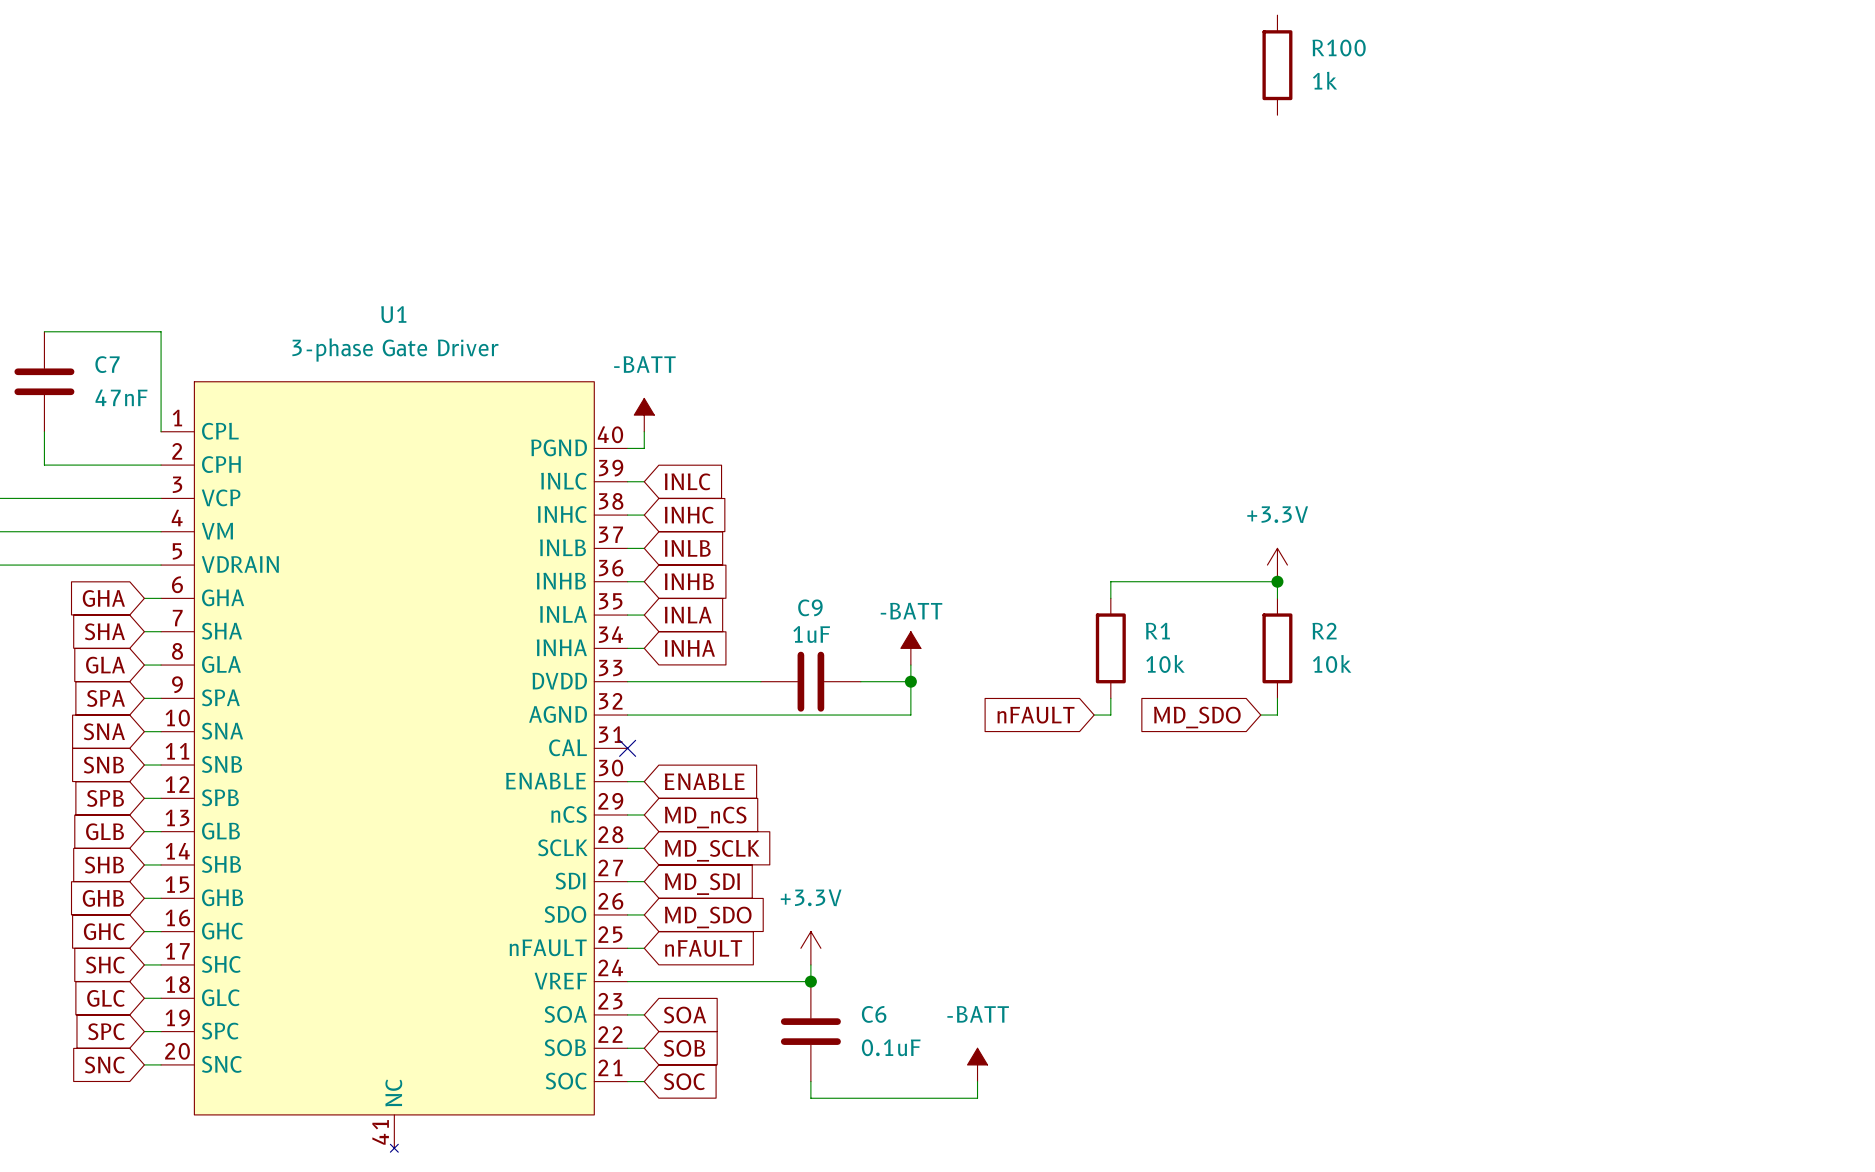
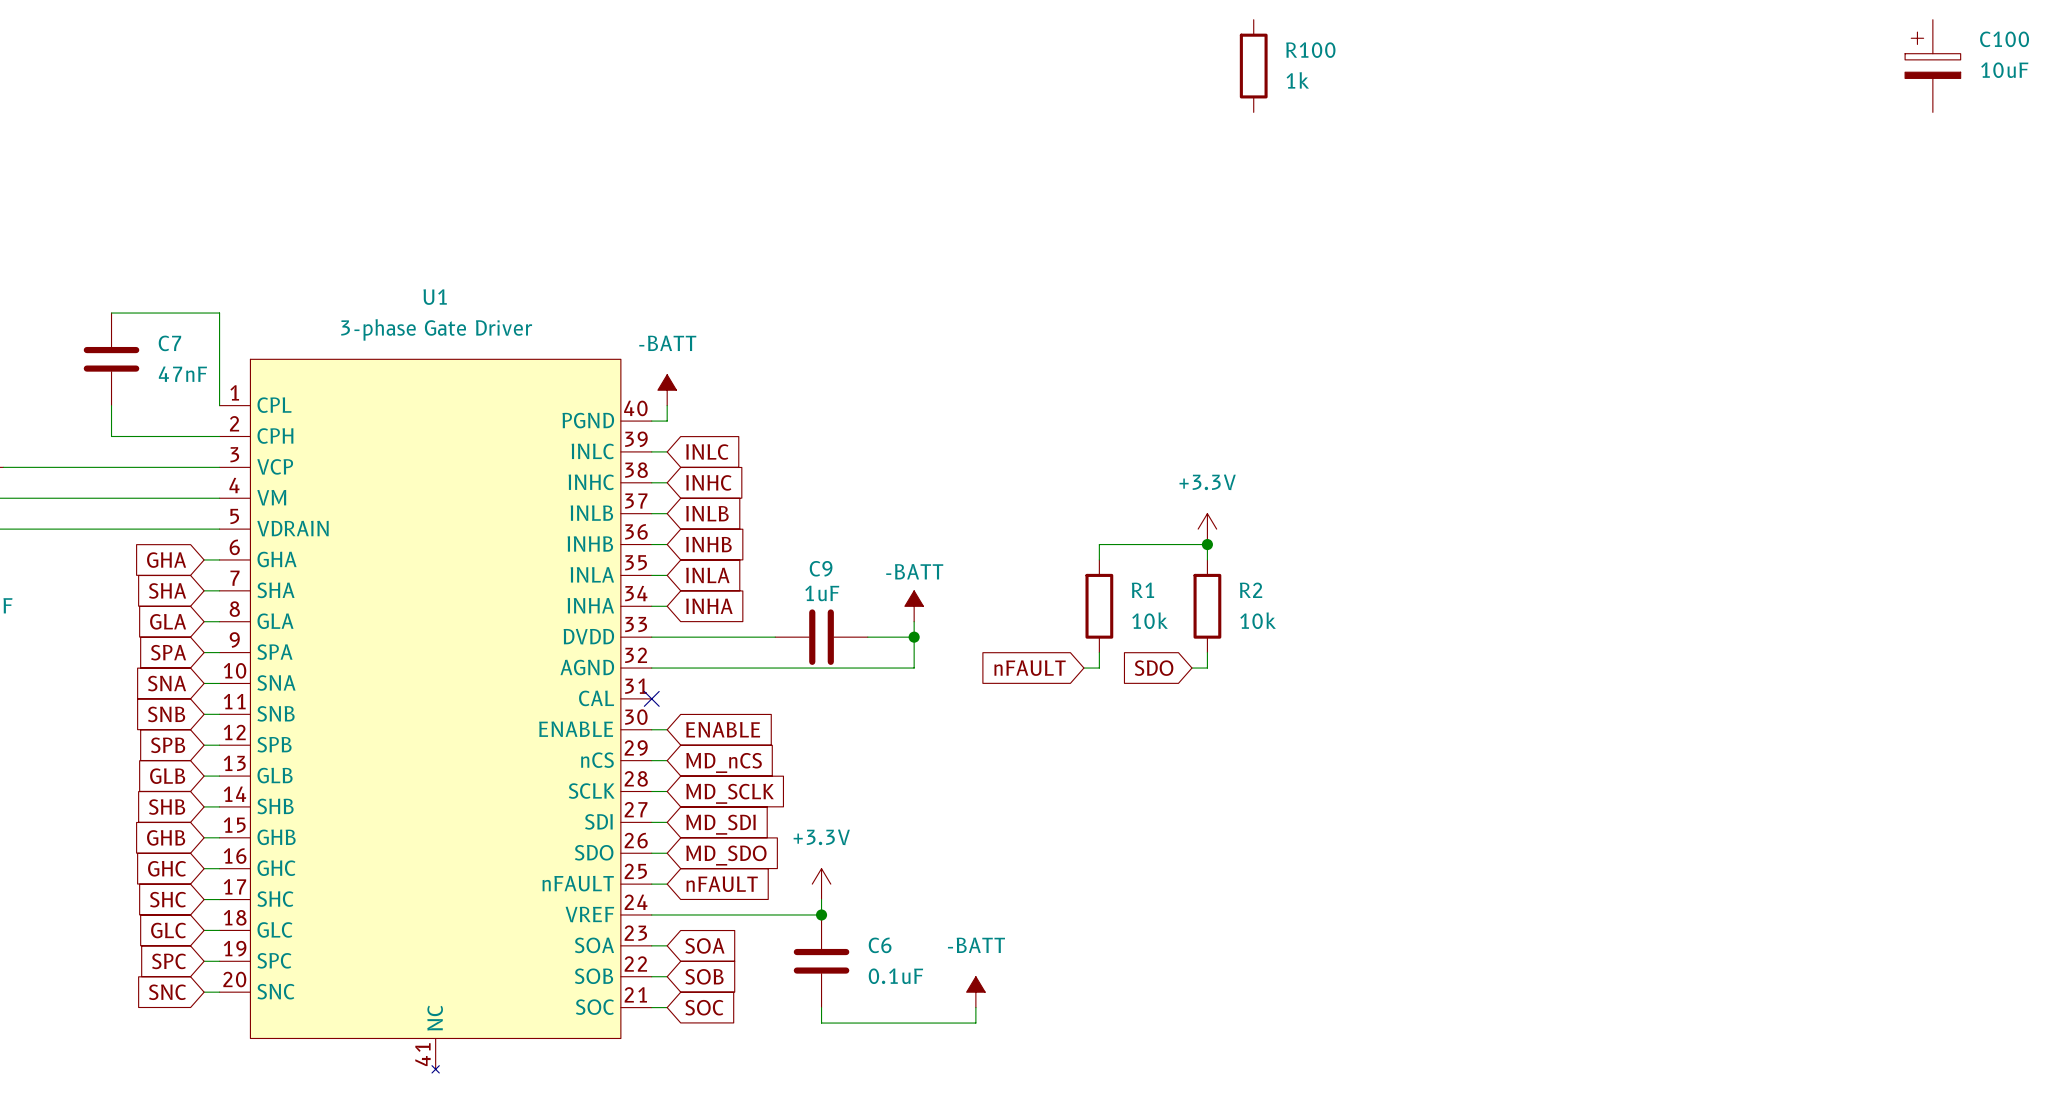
power symbol position: +3.3V (1277, 565) -> +3.3V (1207, 529)
wire: (1227, 581) (1277, 581) (1277, 598) -> (1207, 544) (1207, 559)
junction position: (1277, 581) -> (1207, 544)
R2 position: (1277, 648) -> (1207, 606)
wire: (1277, 698) (1277, 715) (1260, 715) -> (1207, 652) (1207, 668) (1191, 668)
global label: MD_SDO (1197, 717) -> SDO (1154, 668)

